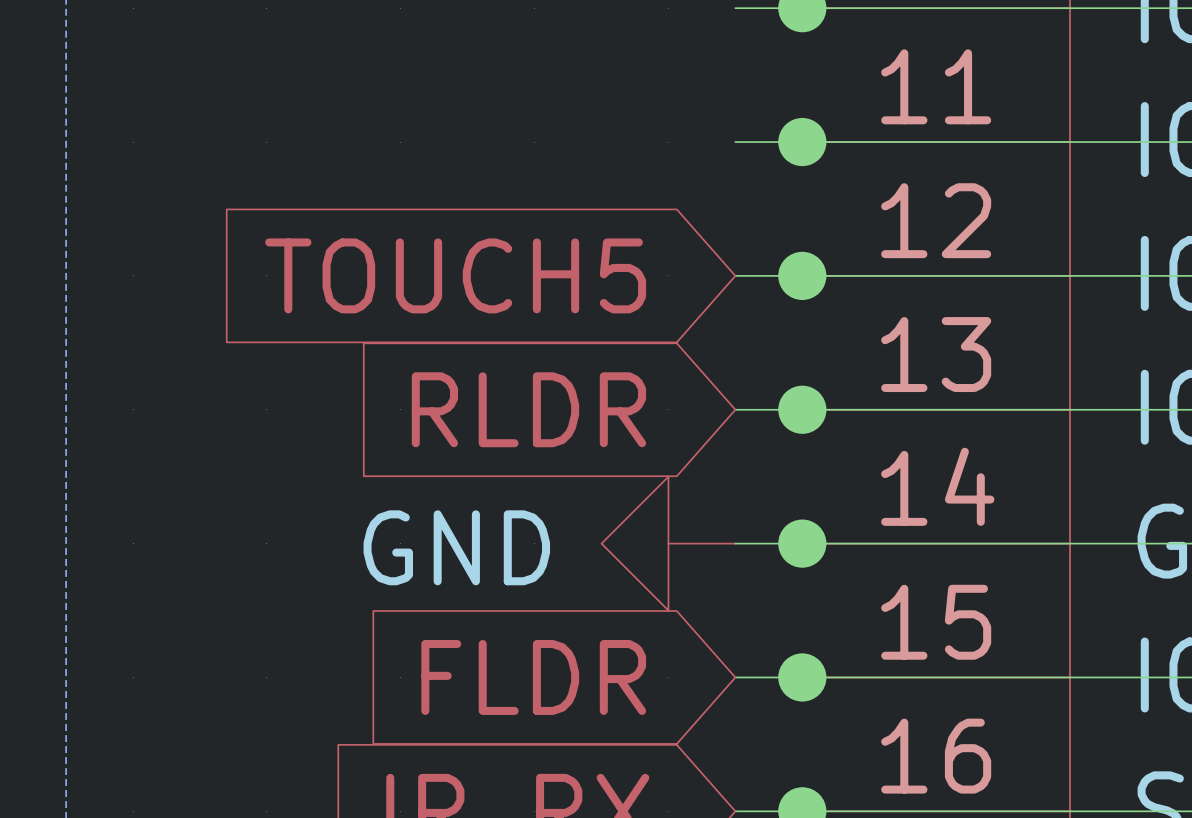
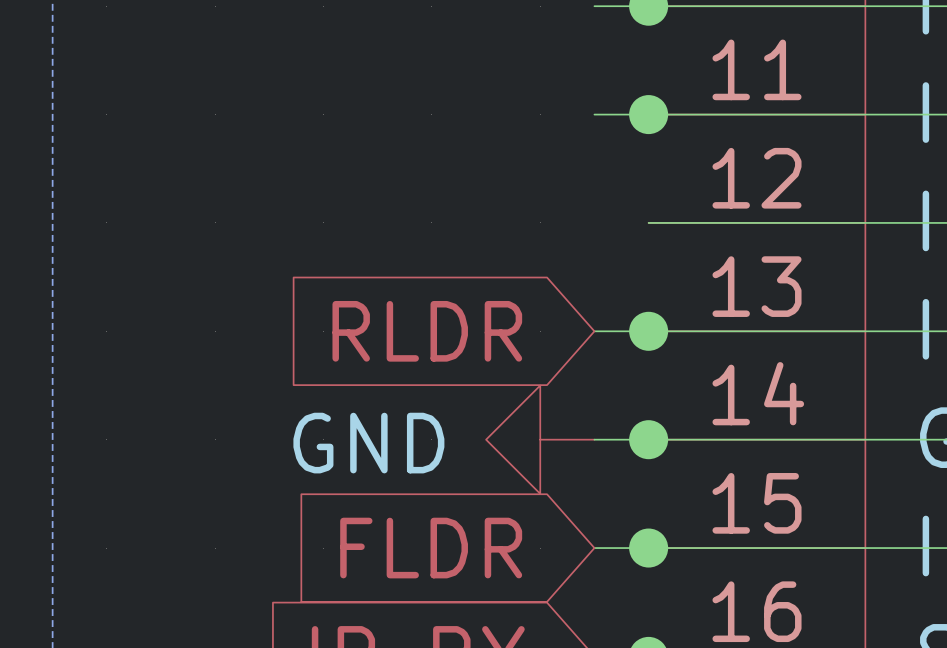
global label: TOUCH5 (455, 275) -> none
wire: (735, 275) (802, 275) -> none
junction: (802, 275) -> none

